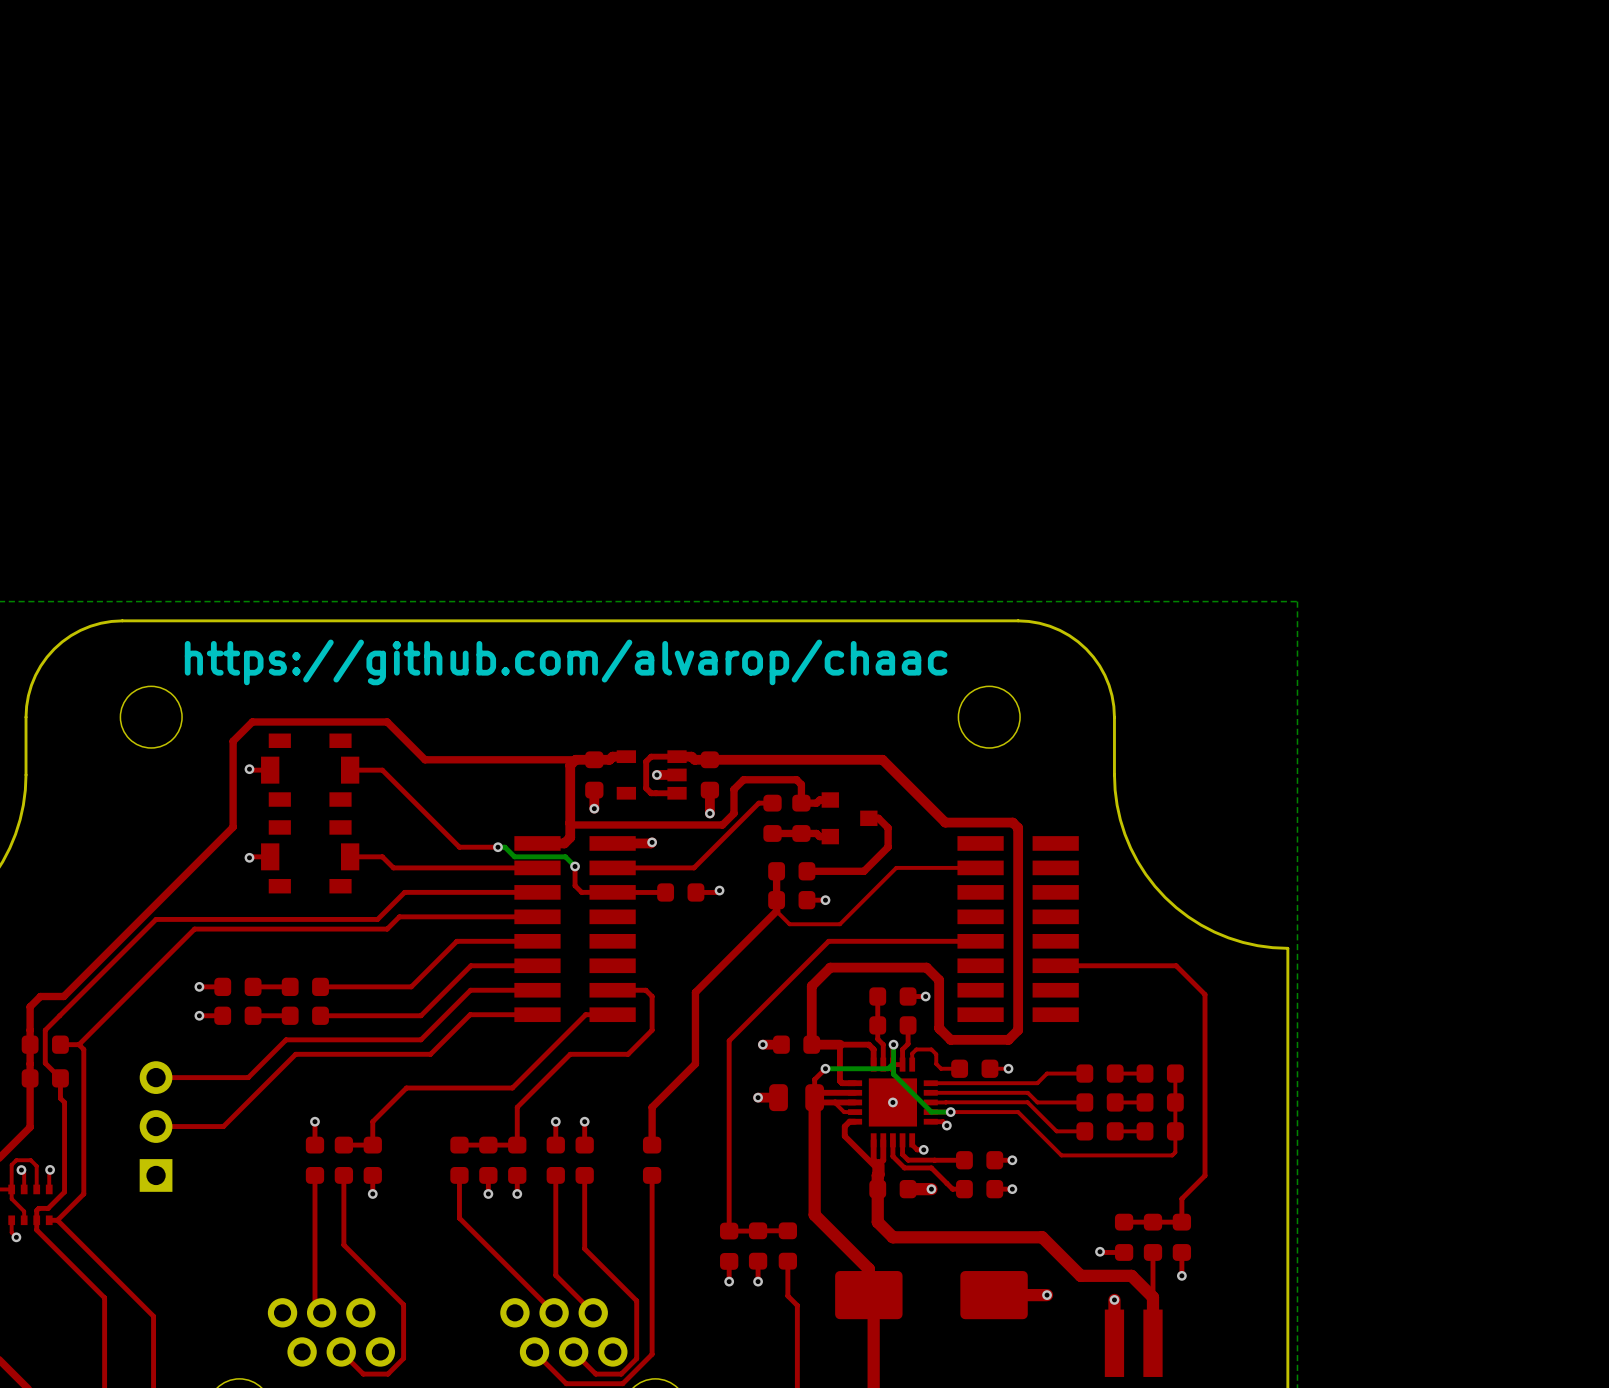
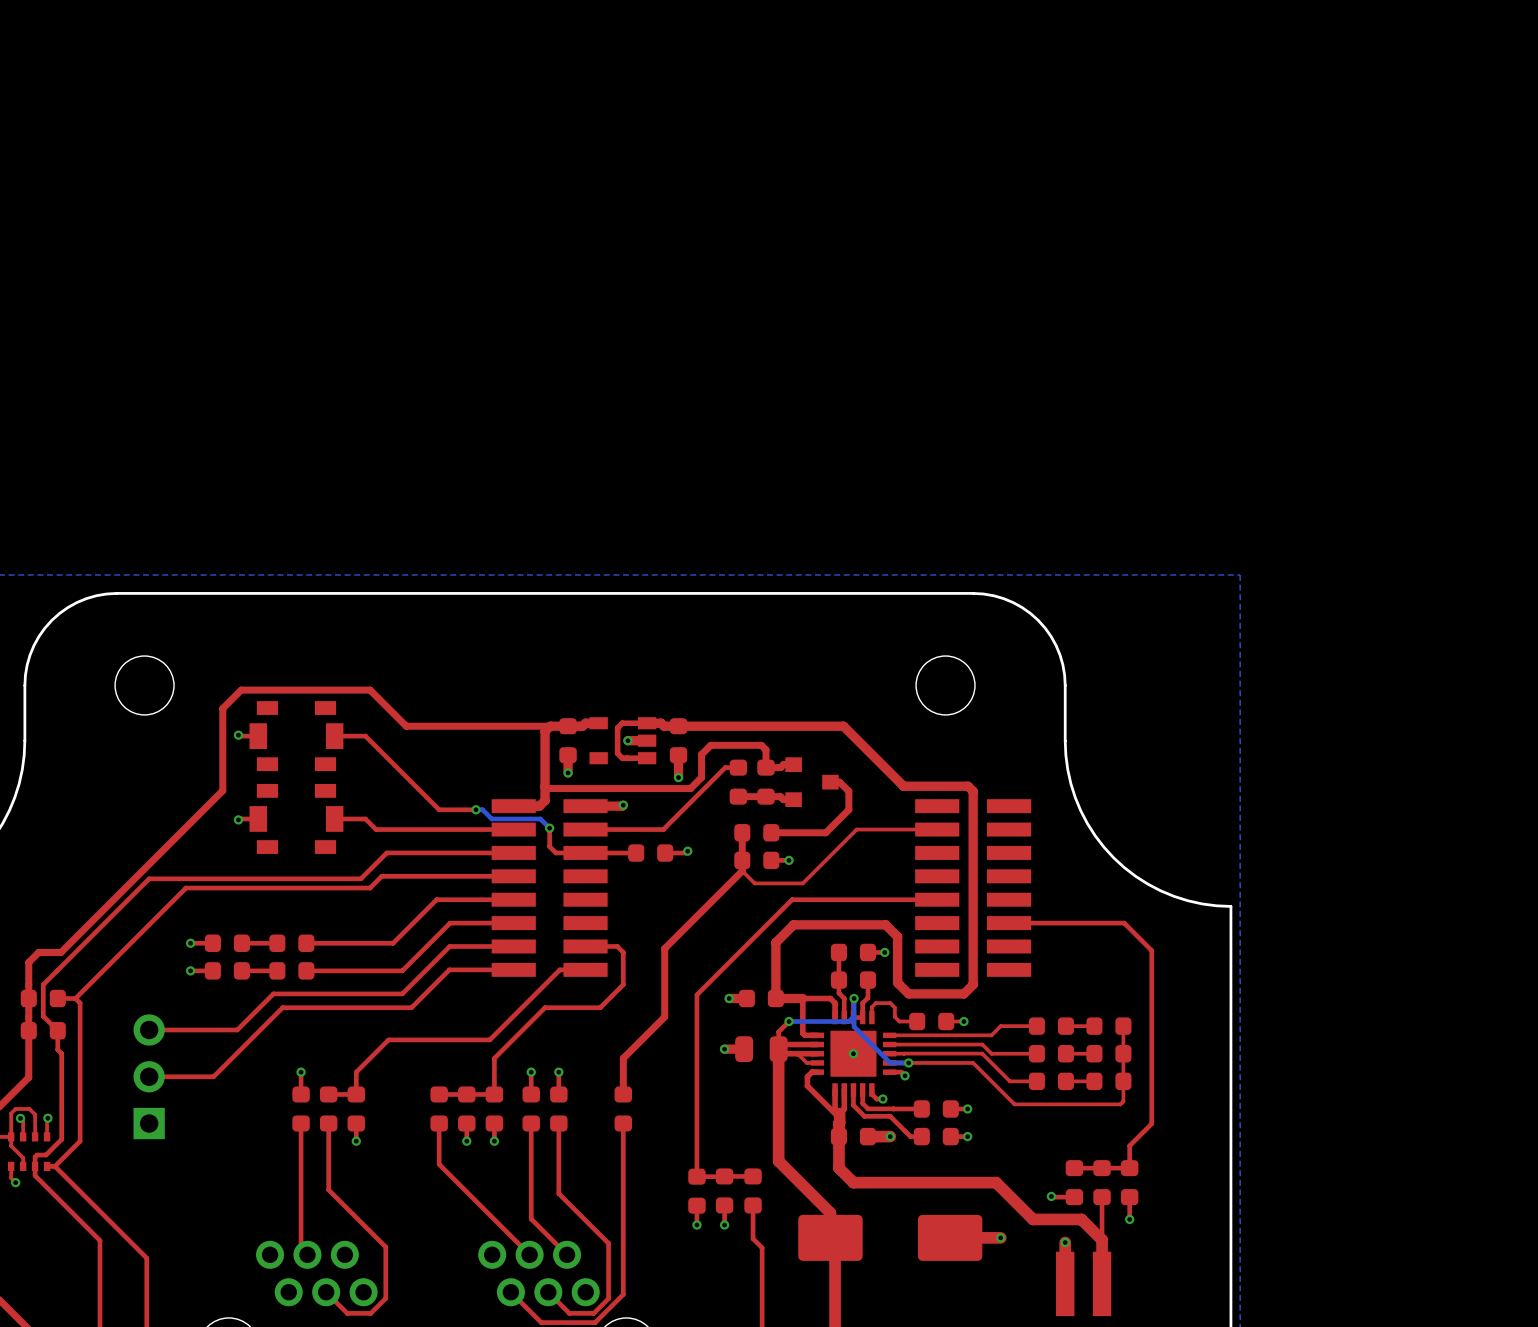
text: https://github.com/alvarop/chaac (566, 662) -> none

